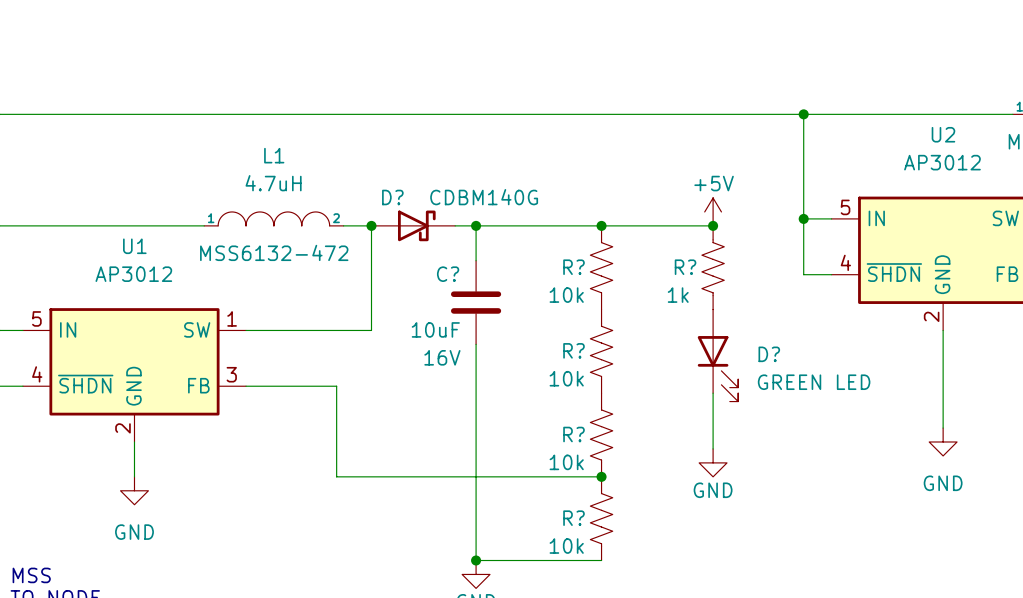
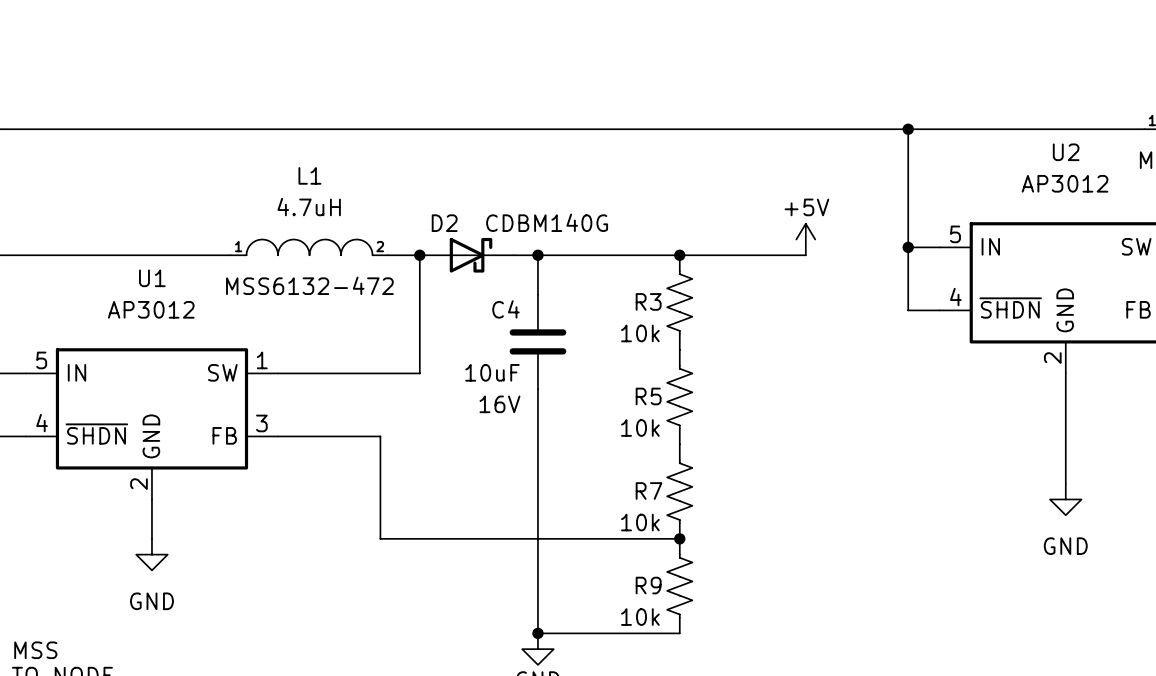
D? name: D? (392, 197) -> D2 (444, 223)
junction: (713, 225) -> none
R? name: R? (573, 267) -> R3 (648, 301)
R?: 1k (713, 267) -> none
C? name: C? (448, 274) -> C4 (505, 309)
R? name: R? (573, 350) -> R5 (648, 396)
D?: GREEN LED (717, 355) -> none
wire: (713, 393) (713, 448) -> none
R? name: R? (573, 434) -> R7 (649, 491)
power symbol: GND (713, 462) -> none
R? name: R? (573, 518) -> R9 (648, 585)

